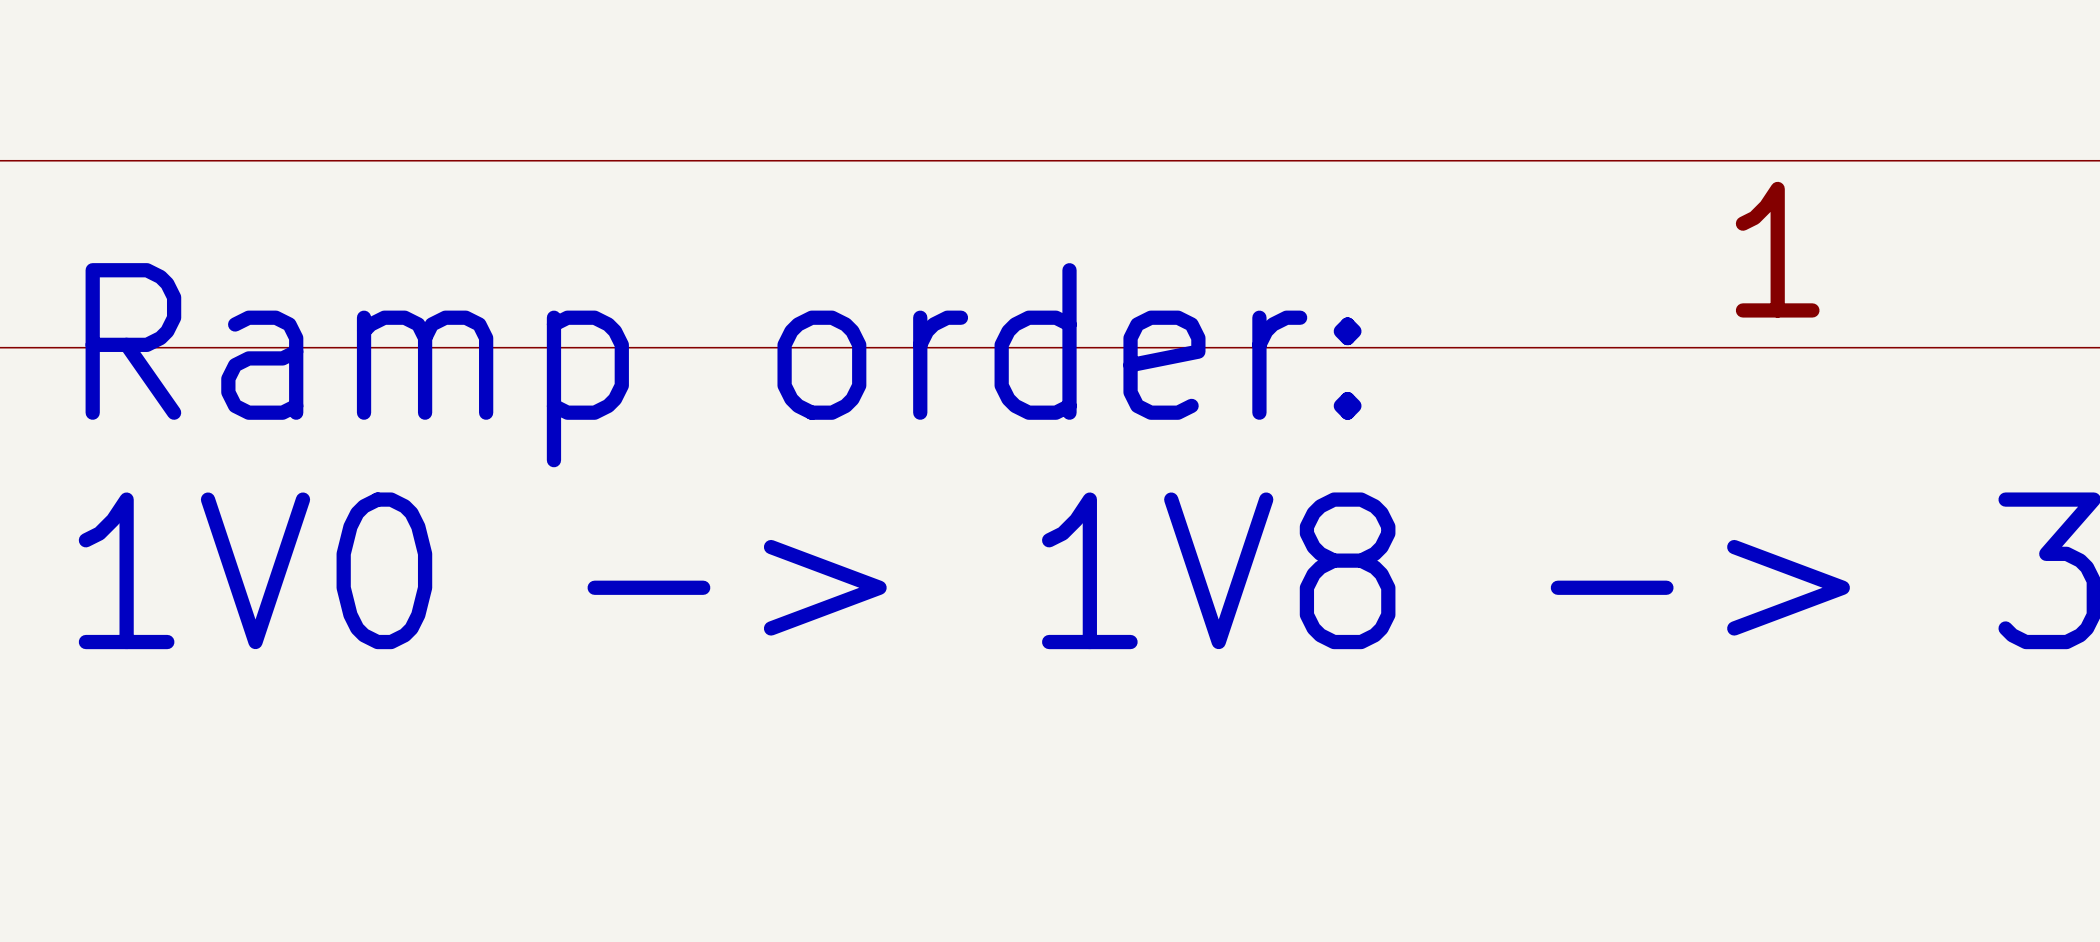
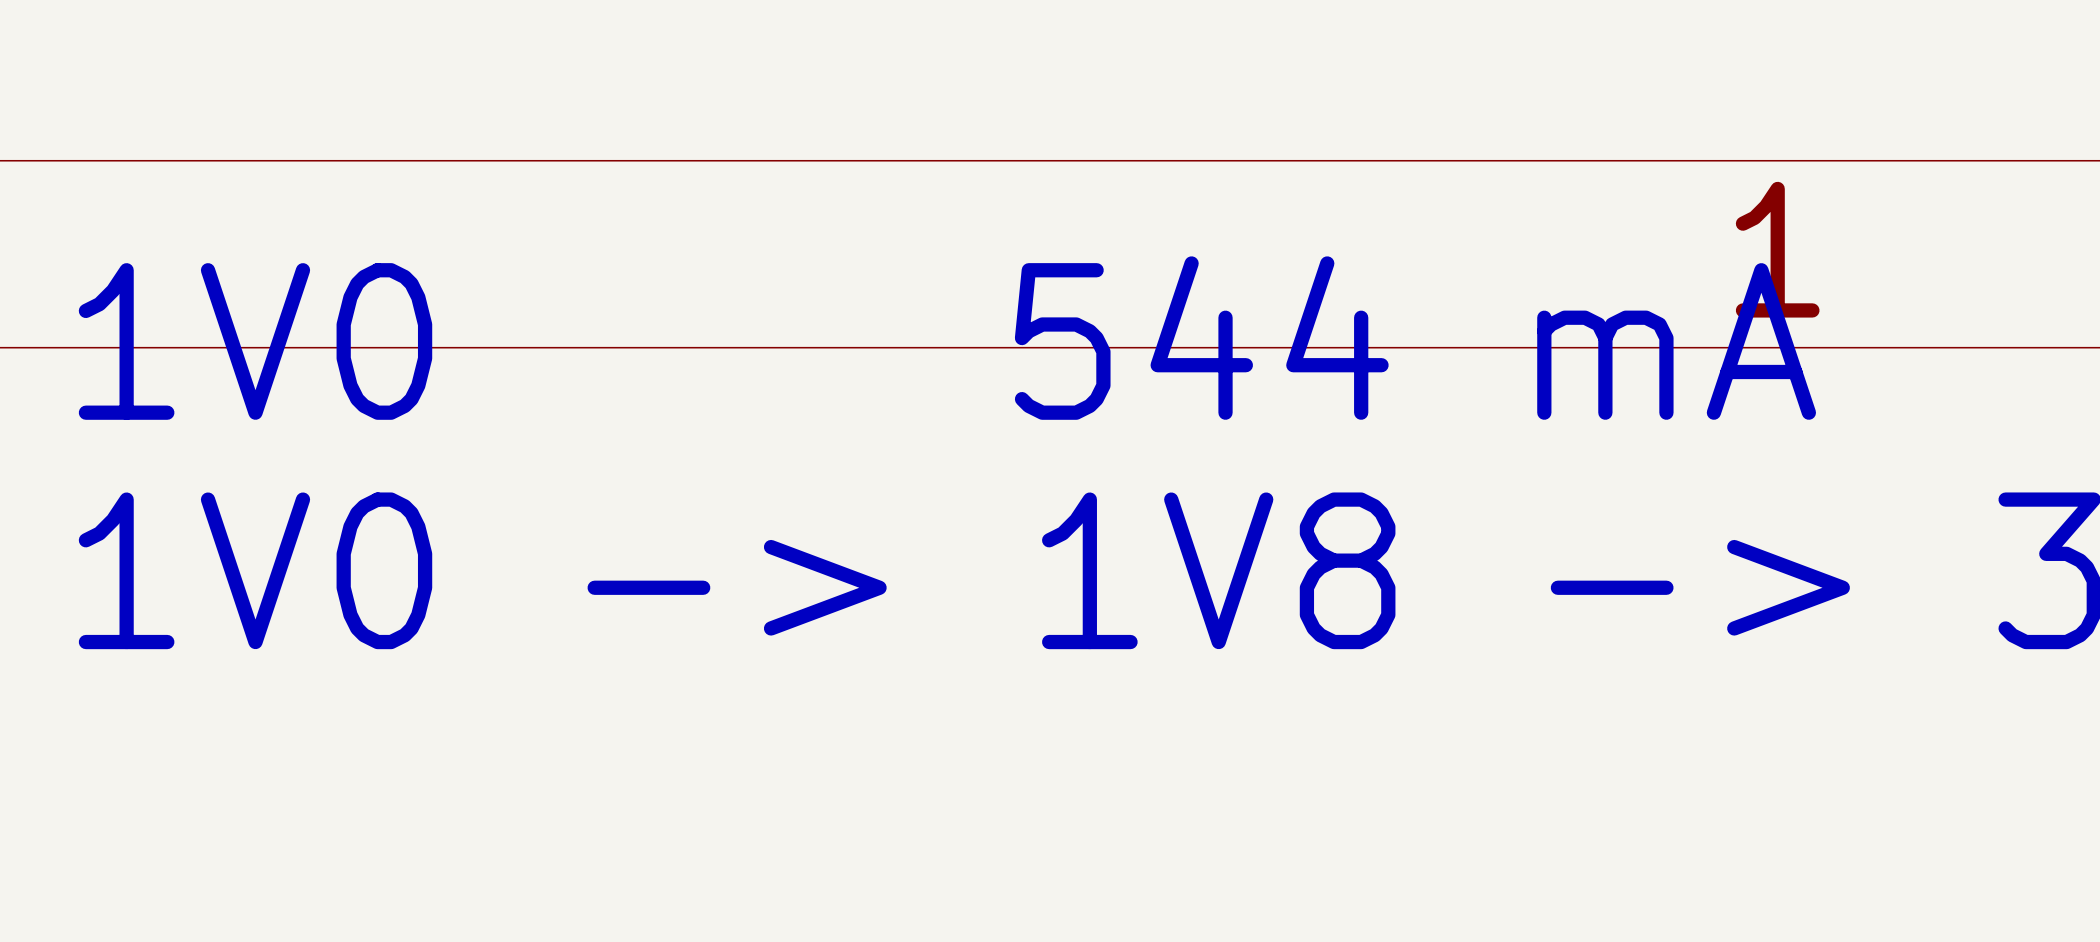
text: Ramp order: (723, 365) -> 1V0 544 mA (947, 338)

